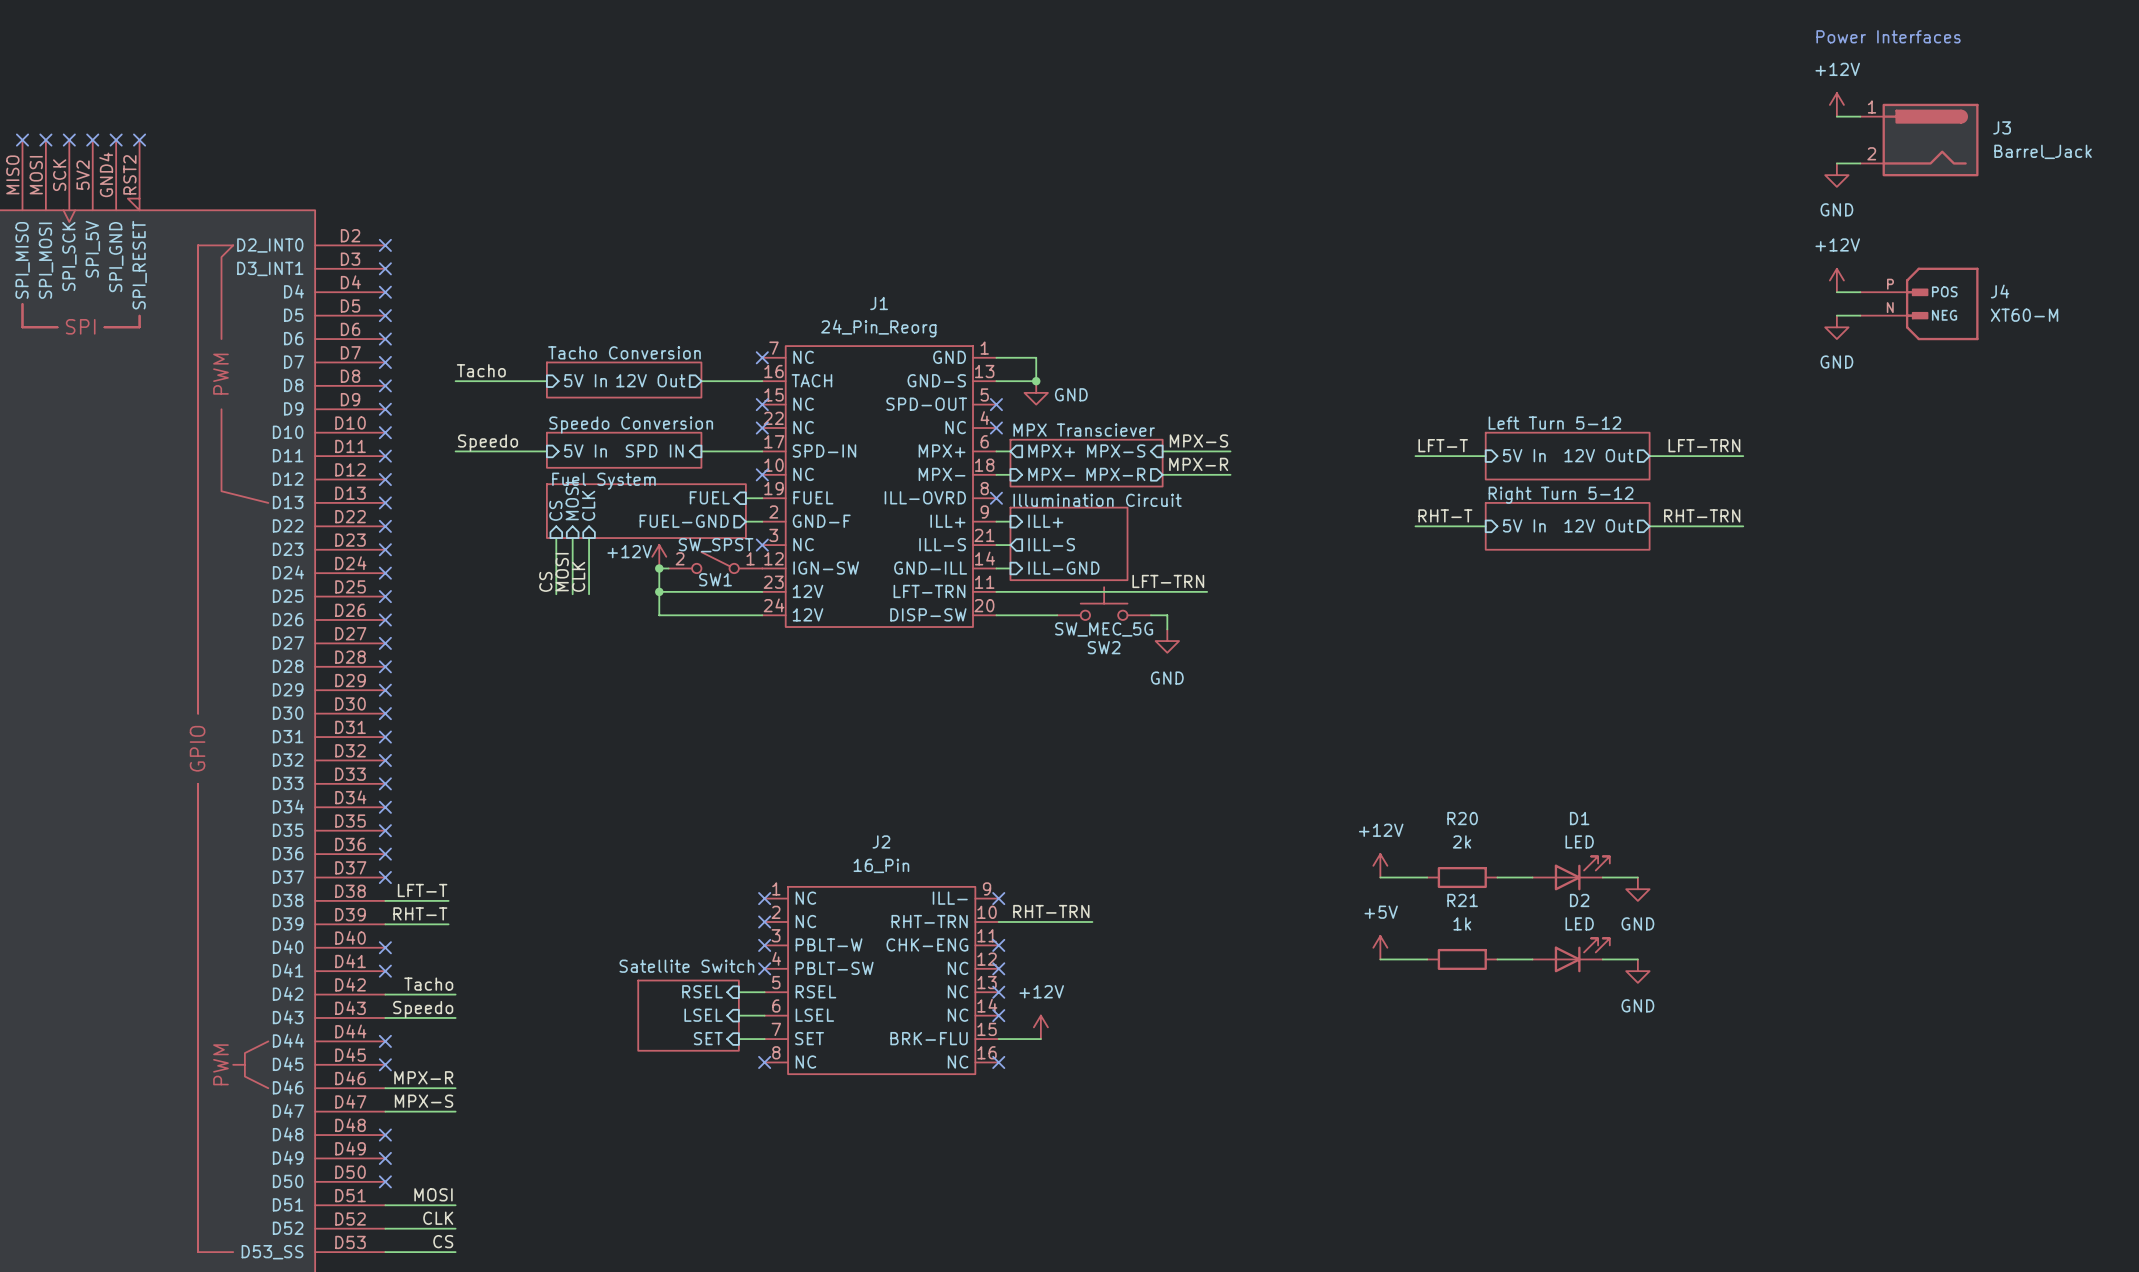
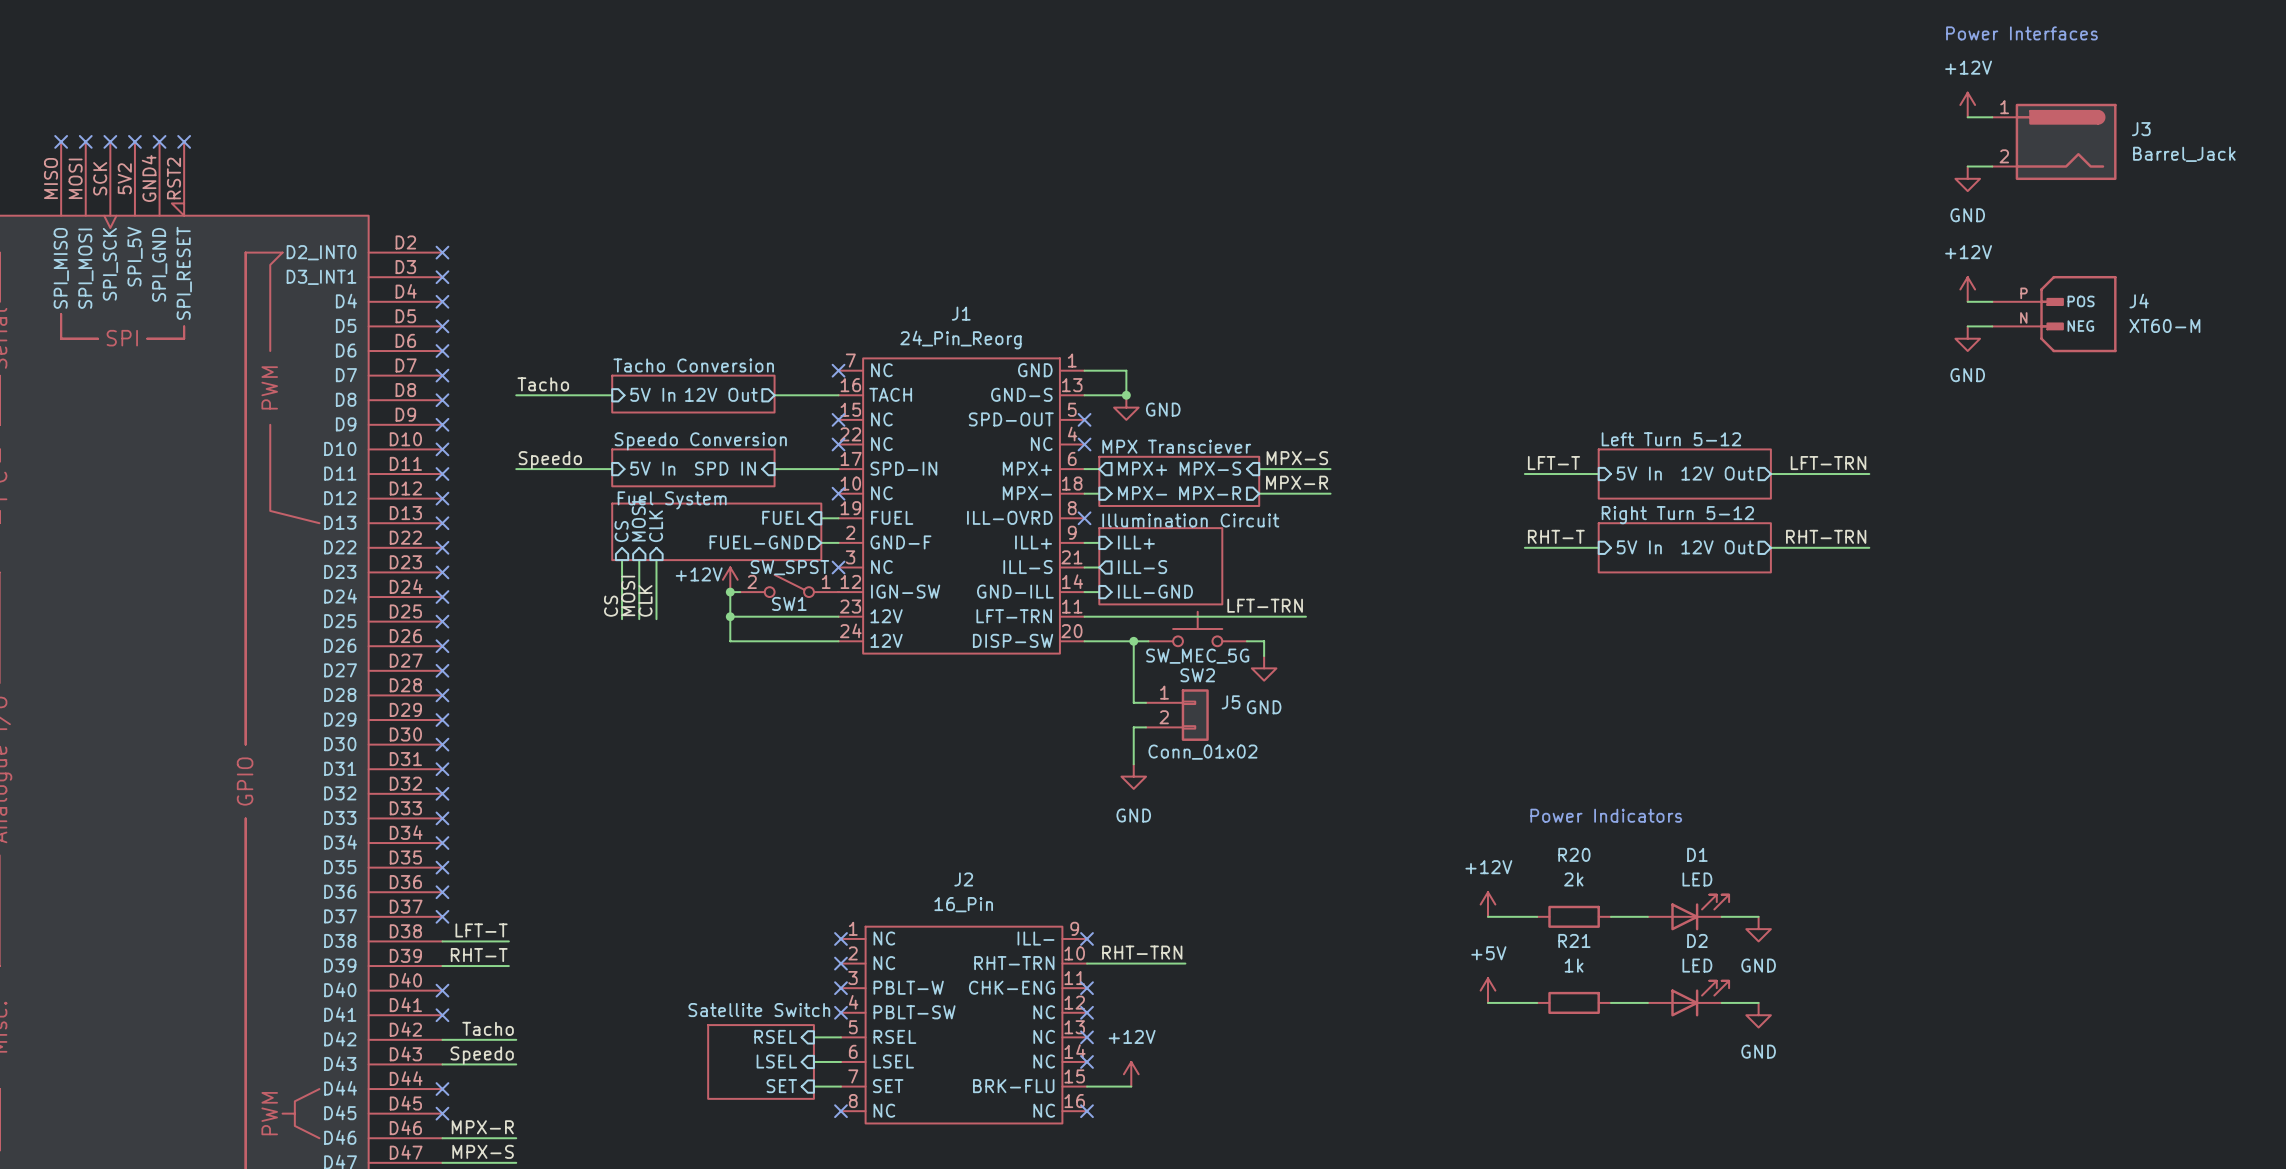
wire: none -> (1133, 641) (1133, 702) (1146, 702)
junction: none -> (1133, 641)
J5: none -> Conn_01x02 (1177, 715)
wire: none -> (1146, 727) (1133, 727) (1133, 764)
power symbol: none -> GND (1133, 776)
text: none -> Power Indicators (1606, 815)

